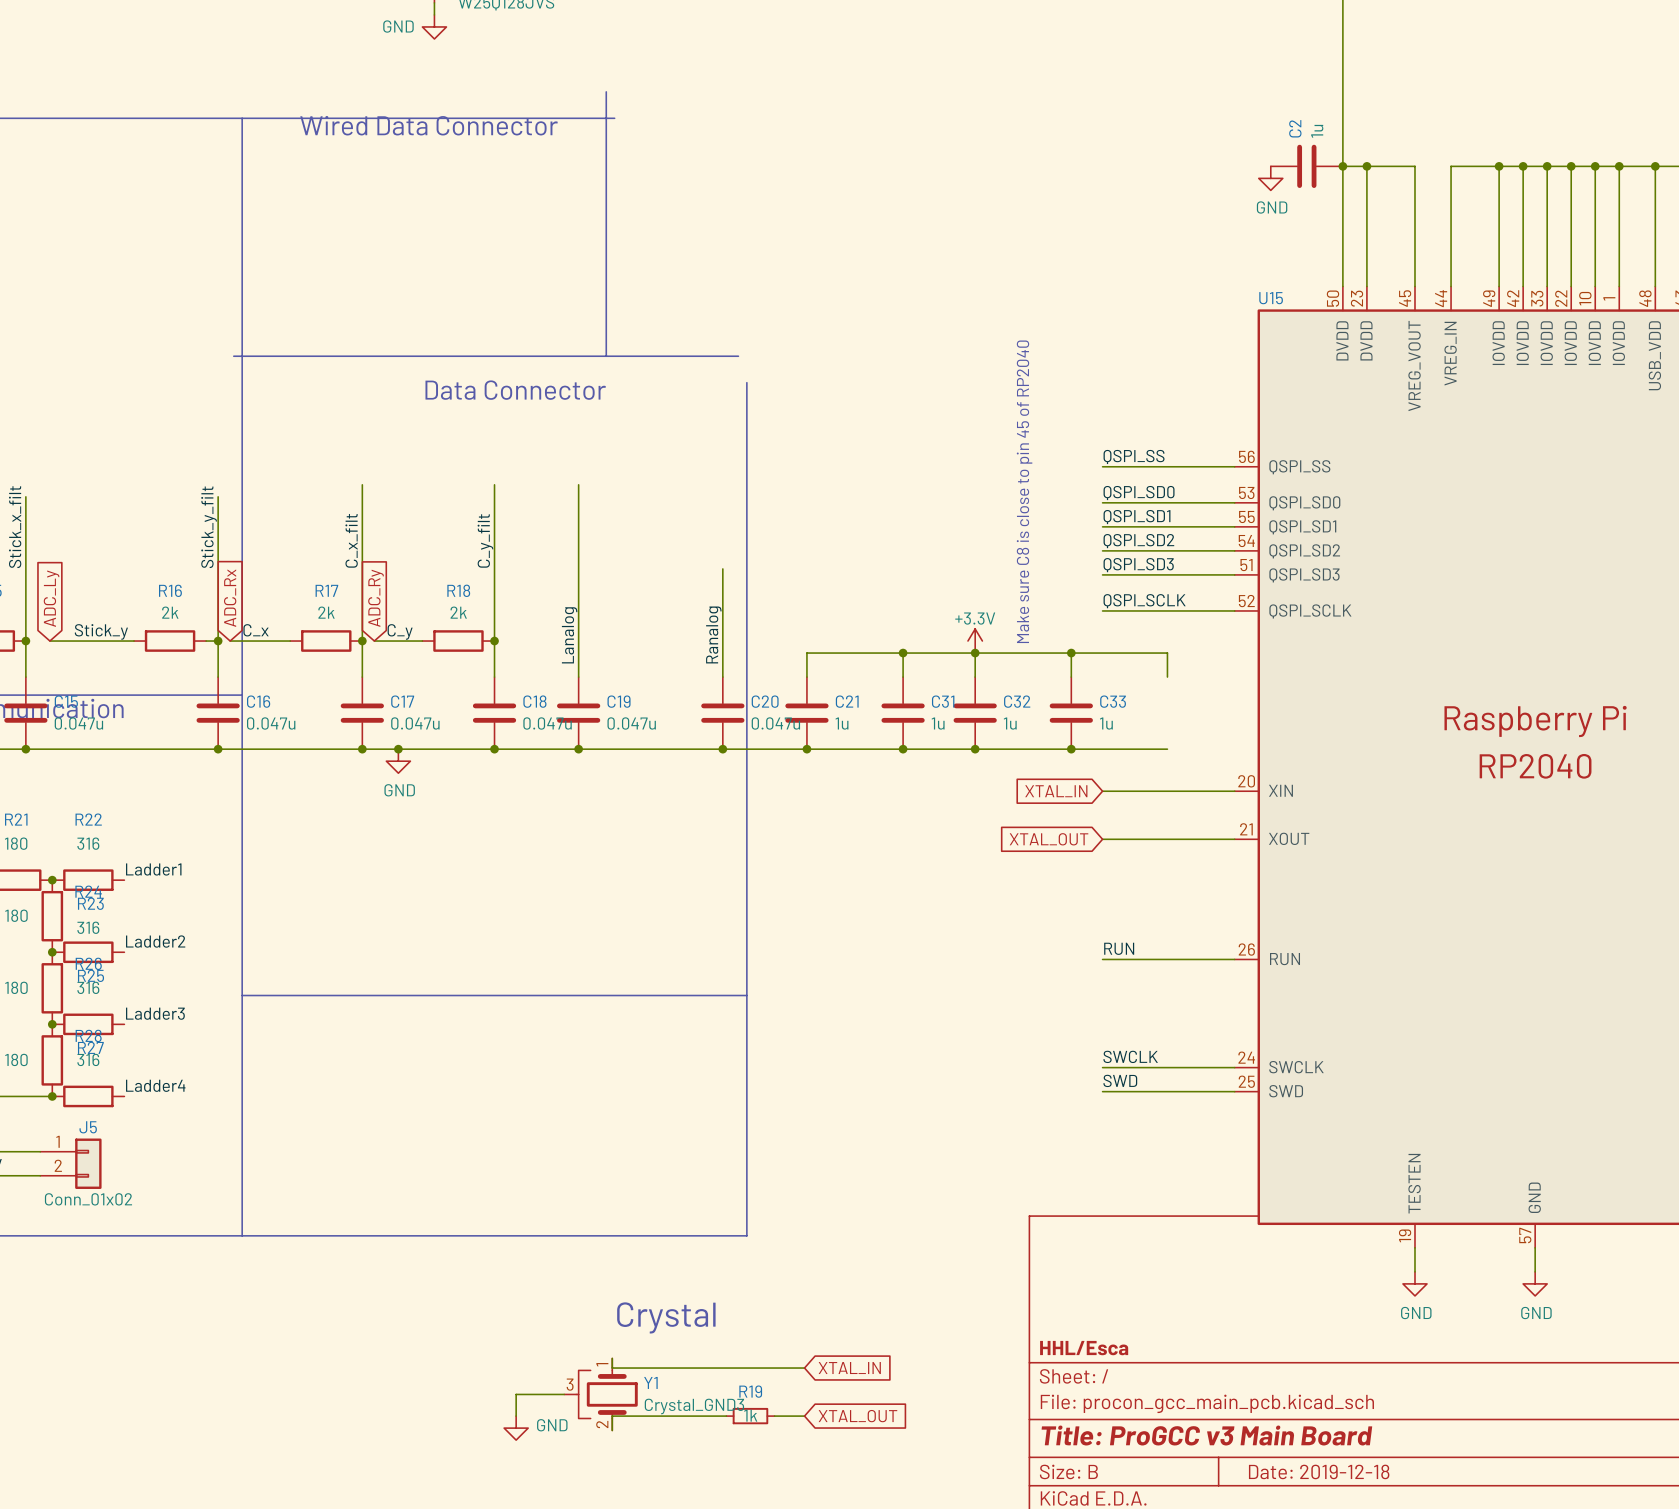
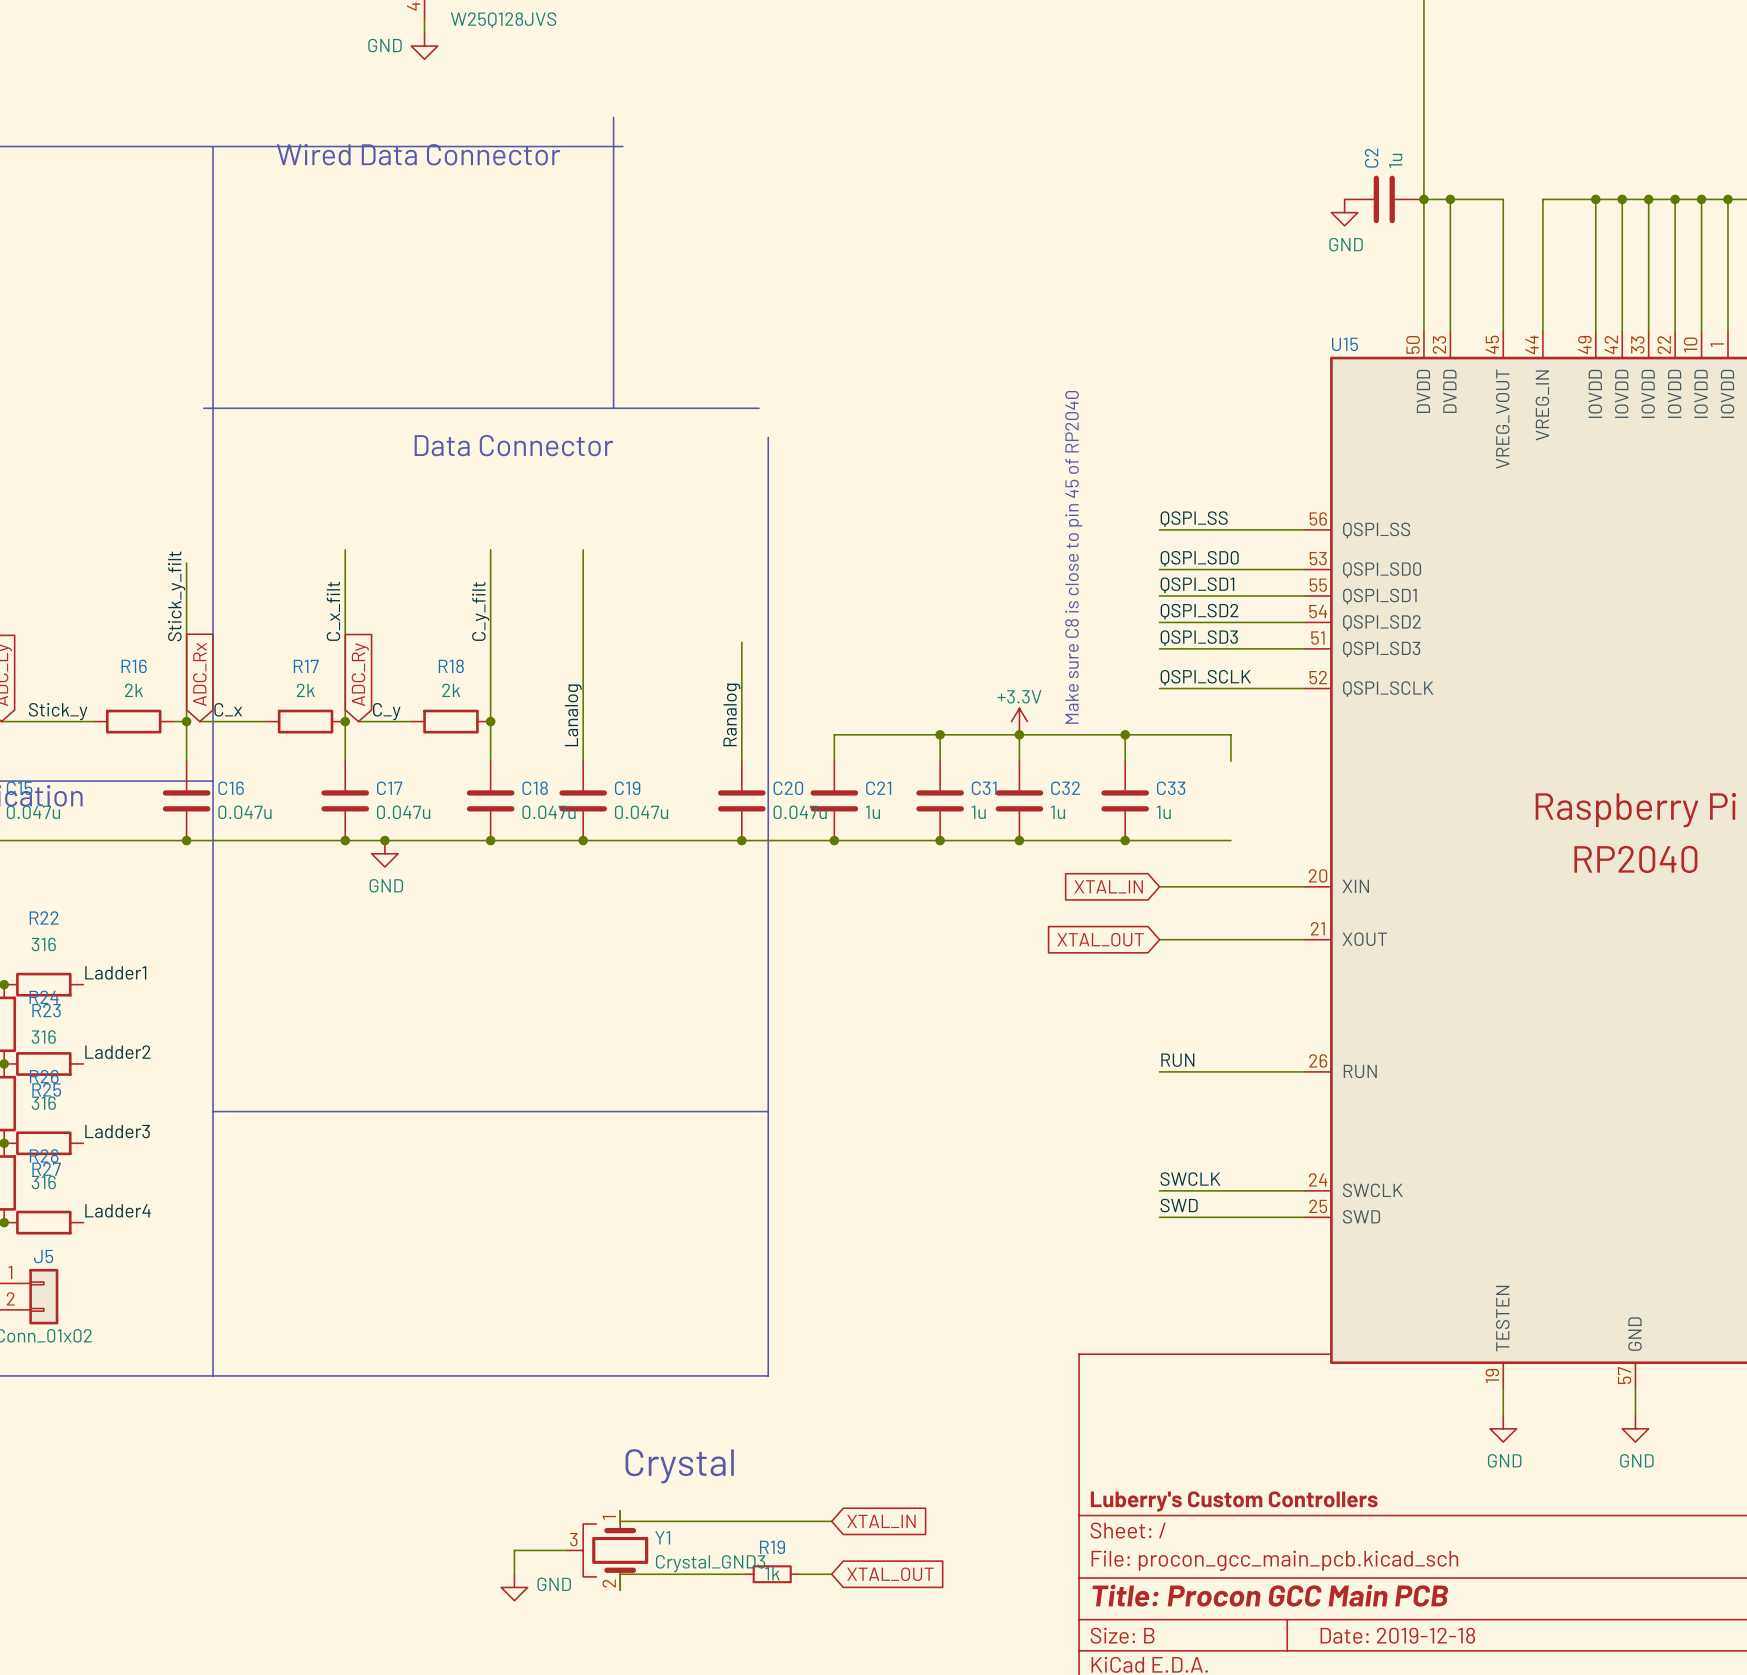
title block: HHL/Esca (1084, 1348) -> Luberry's Custom Controllers (1234, 1501)
title block: Title: ProGCC v3 Main Board (1206, 1435) -> Title: Procon GCC Main PCB (1270, 1595)

